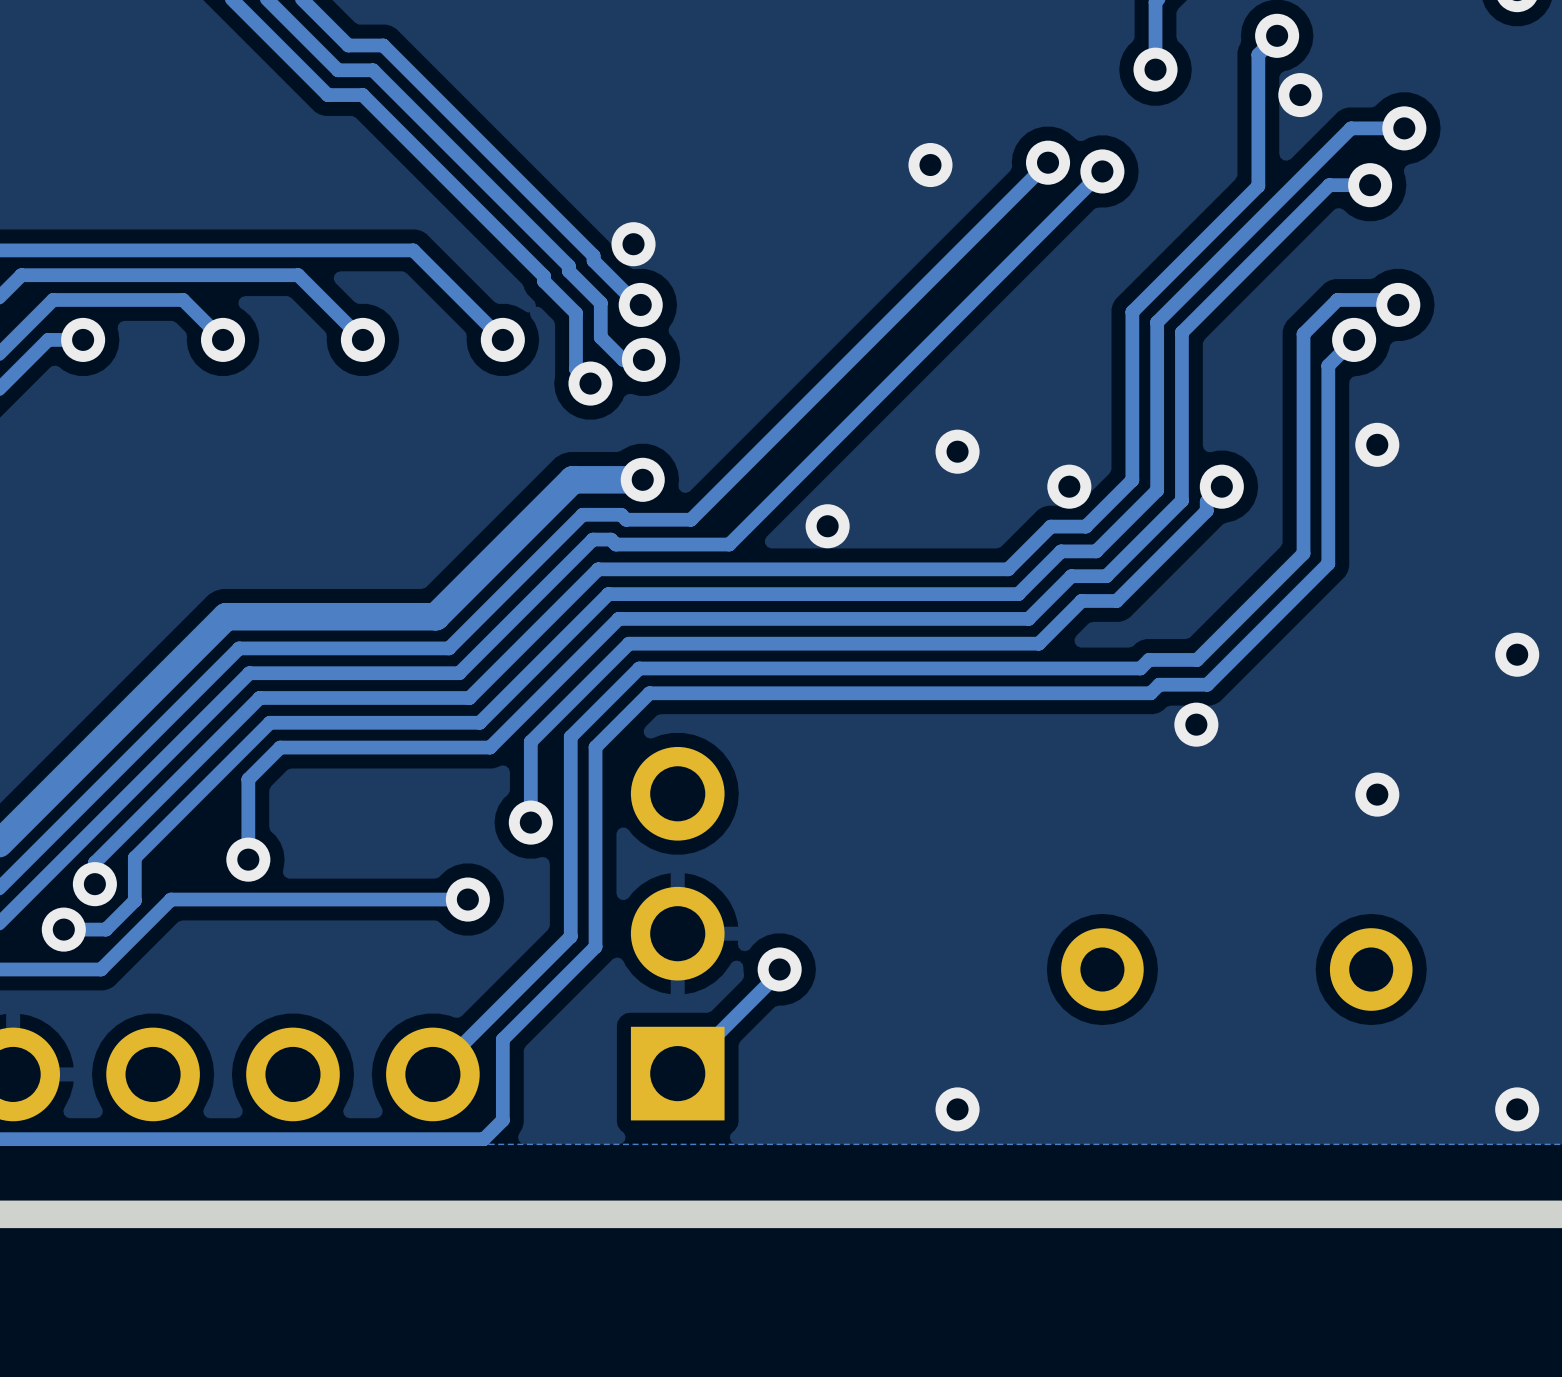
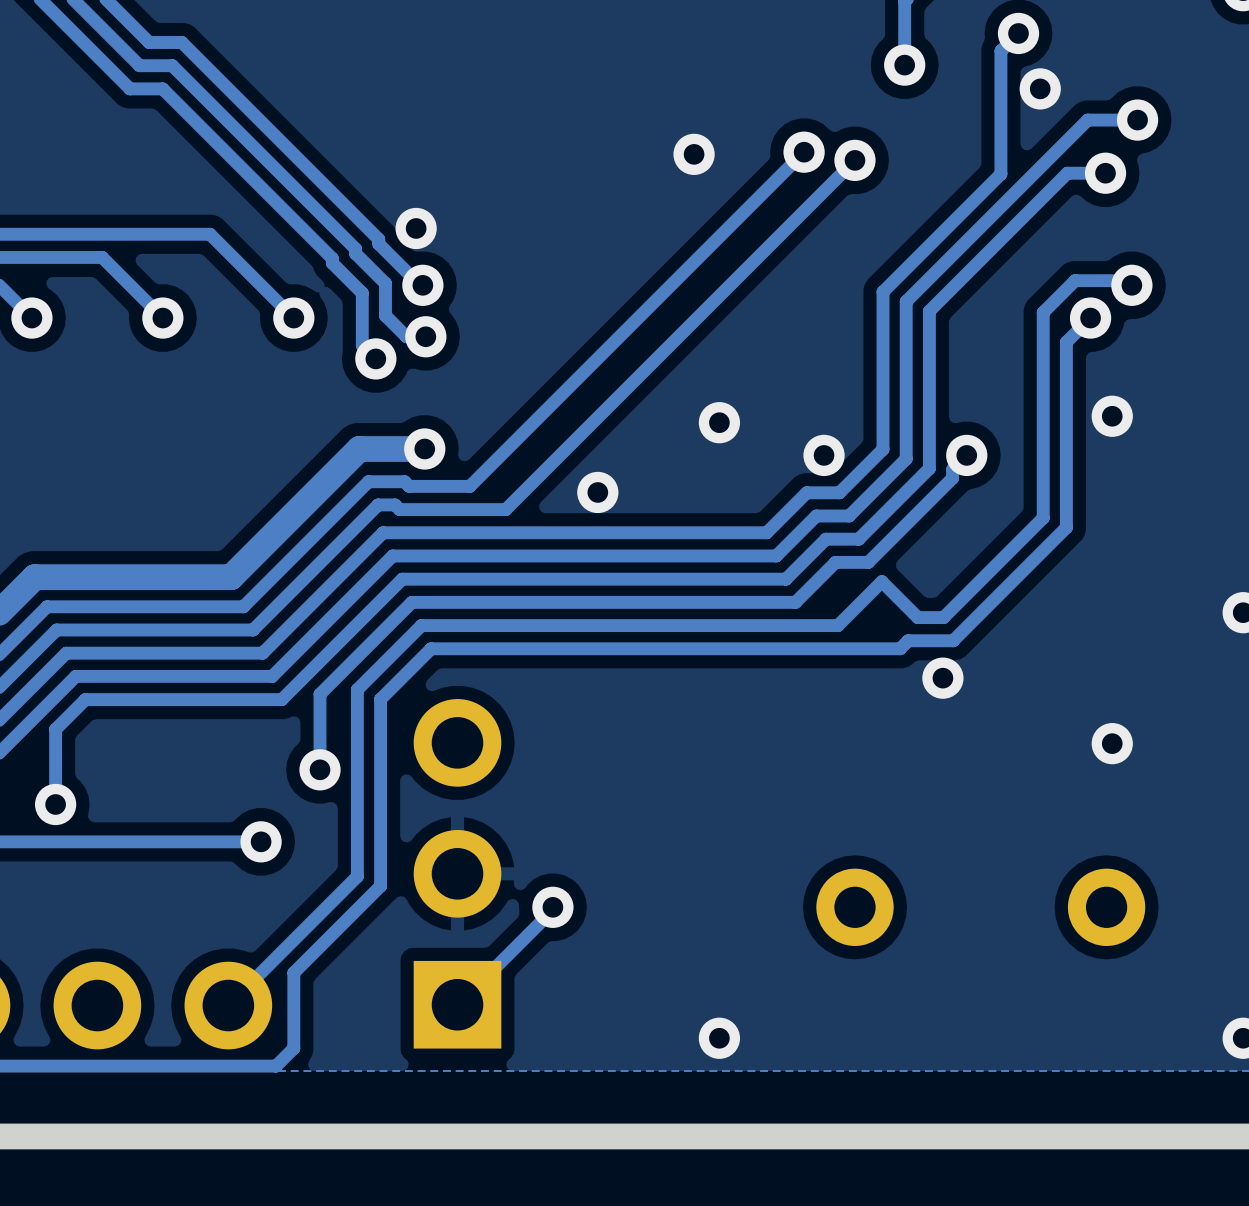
track: (1169, 659) (1149, 659) (1140, 668) (1084, 668) -> (917, 617) (881, 581) (837, 625)

